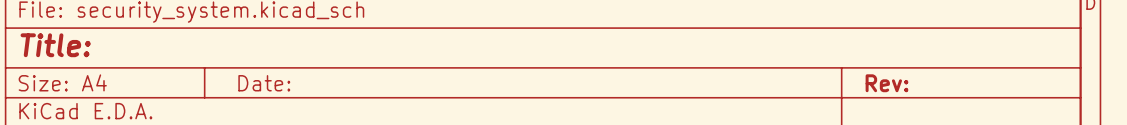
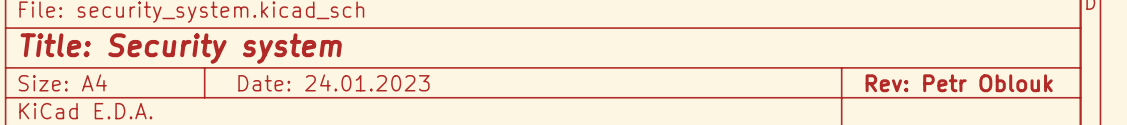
title block: Title: (55, 45) -> Title: Security system (181, 48)
title block: Date: (264, 83) -> Date: 24.01.2023 (333, 82)
title block: Rev: (887, 83) -> Rev: Petr Oblouk (959, 83)

